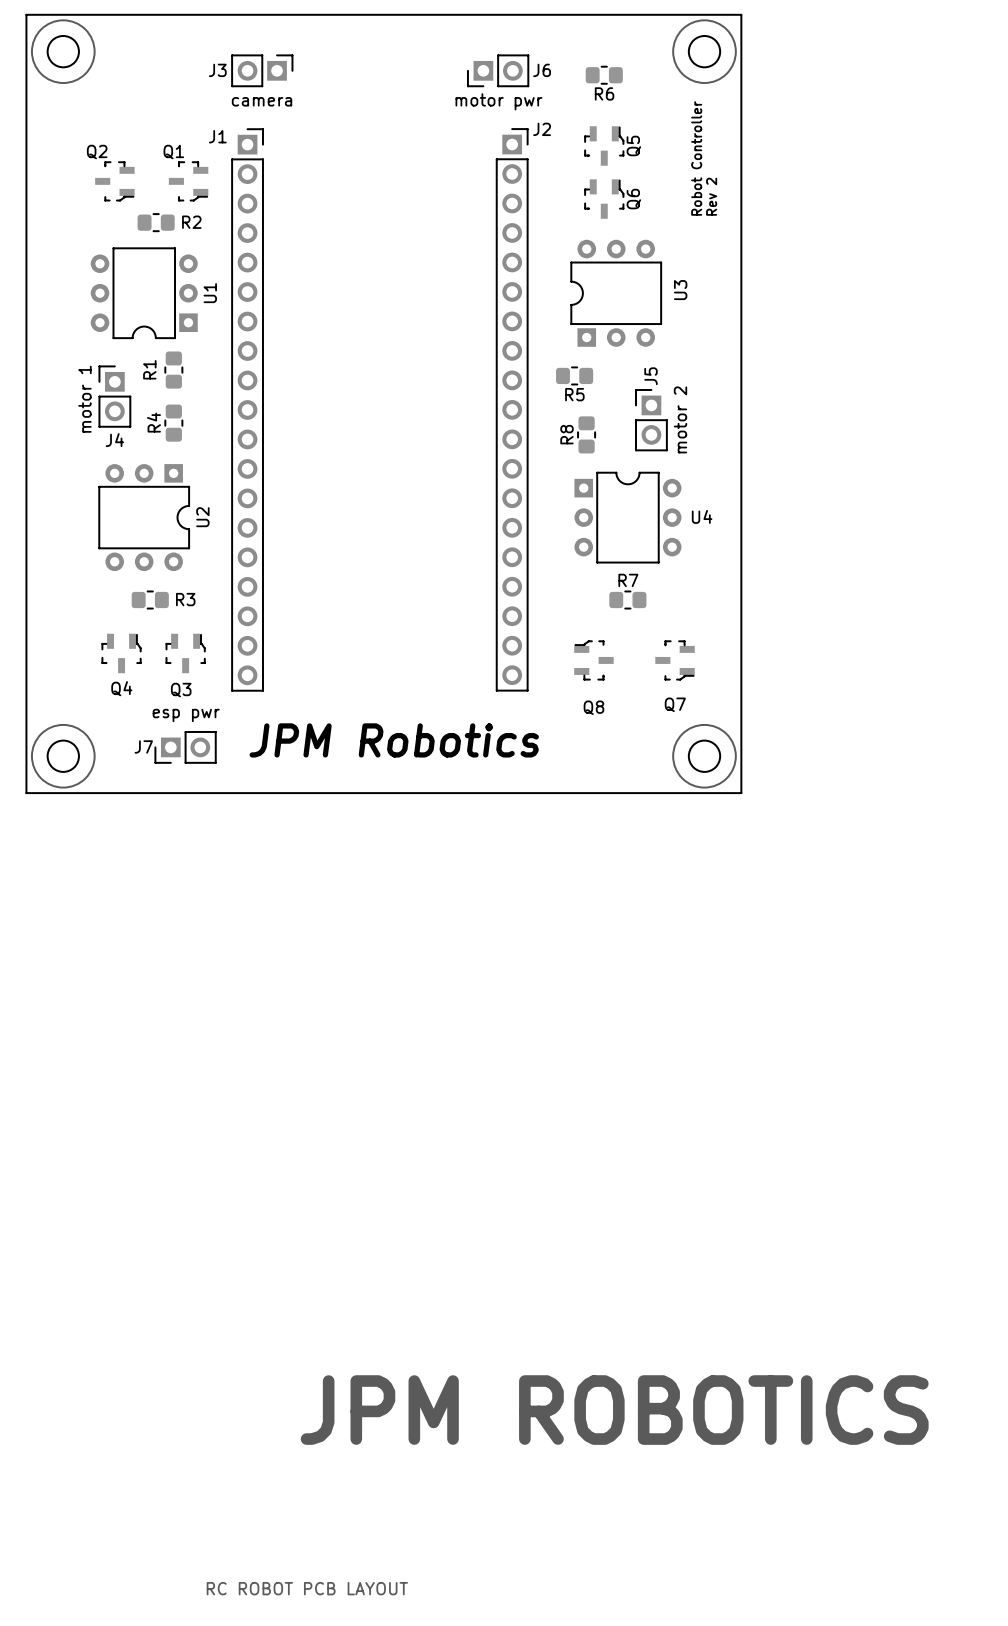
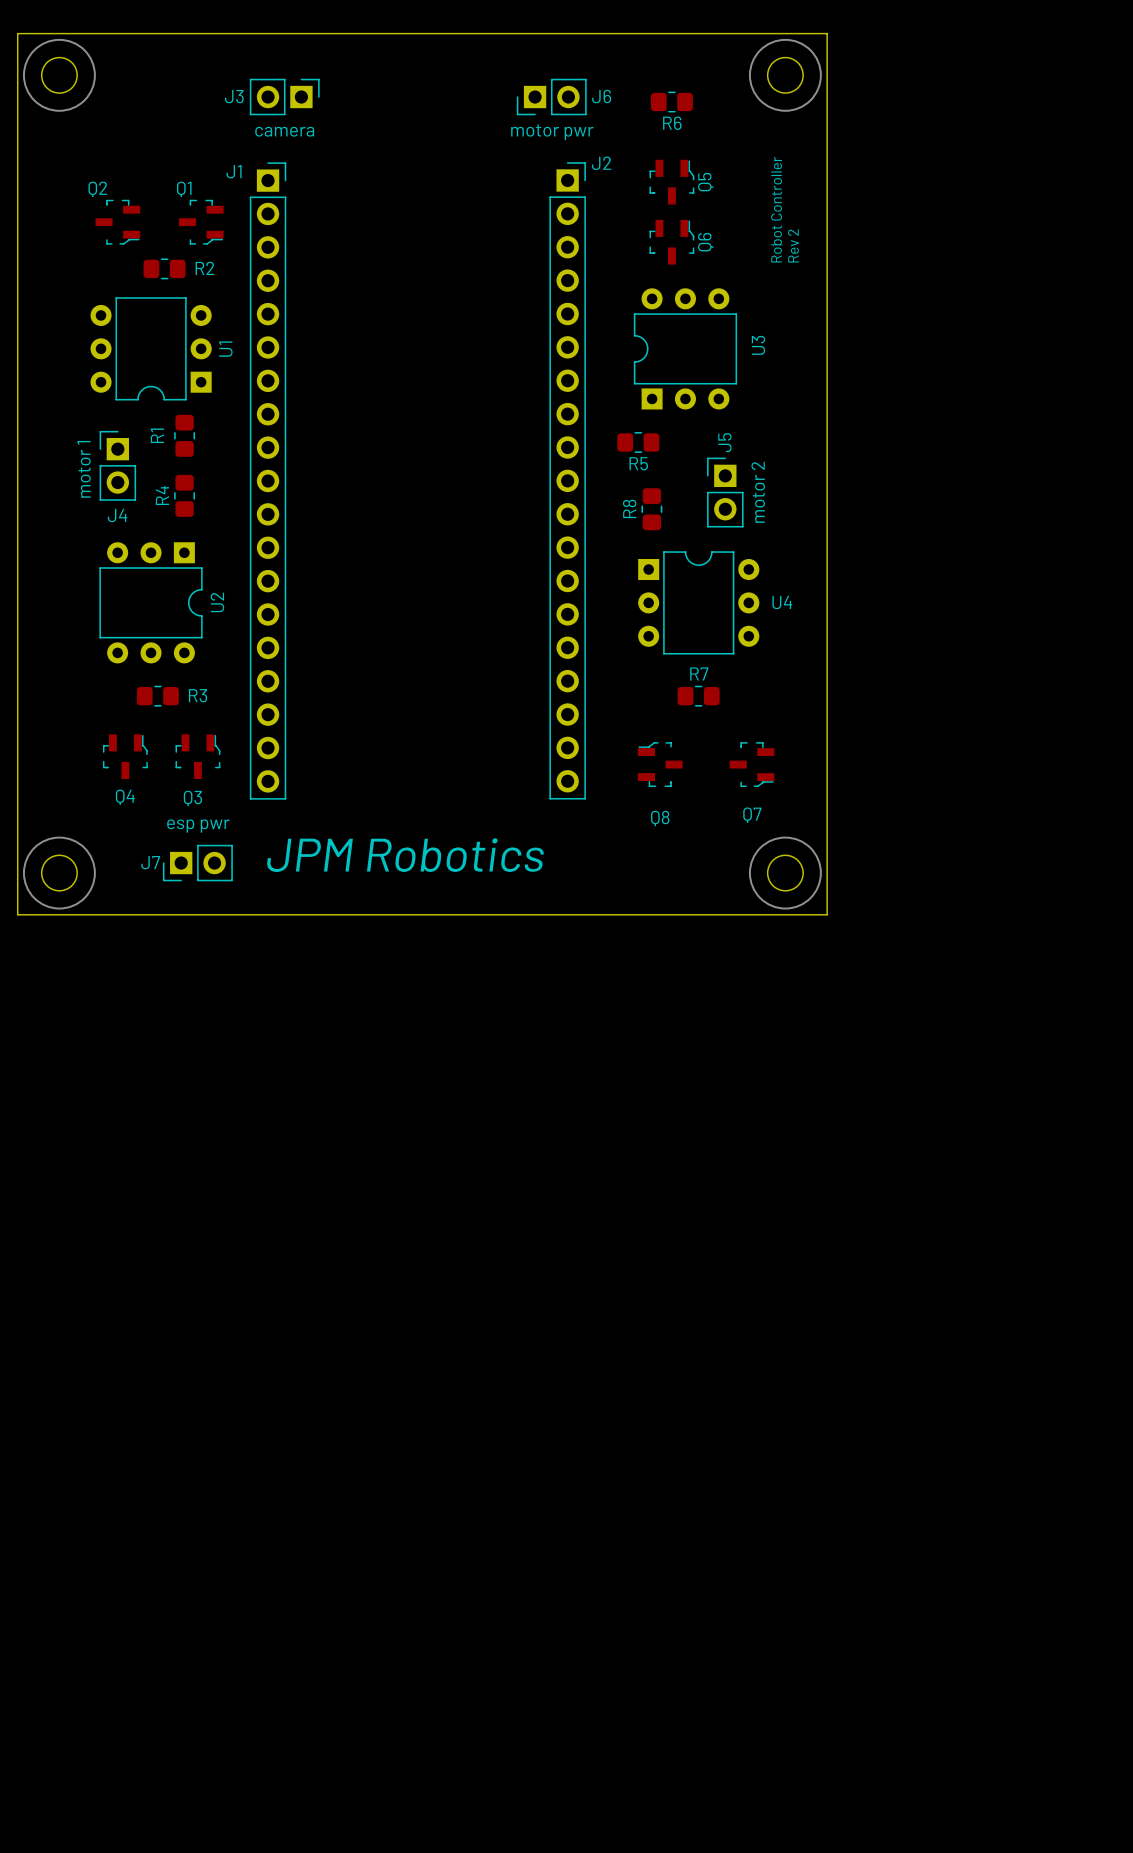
text: JPM ROBOTICS (614, 1410) -> none
text: RC ROBOT PCB LAYOUT (307, 1588) -> none

